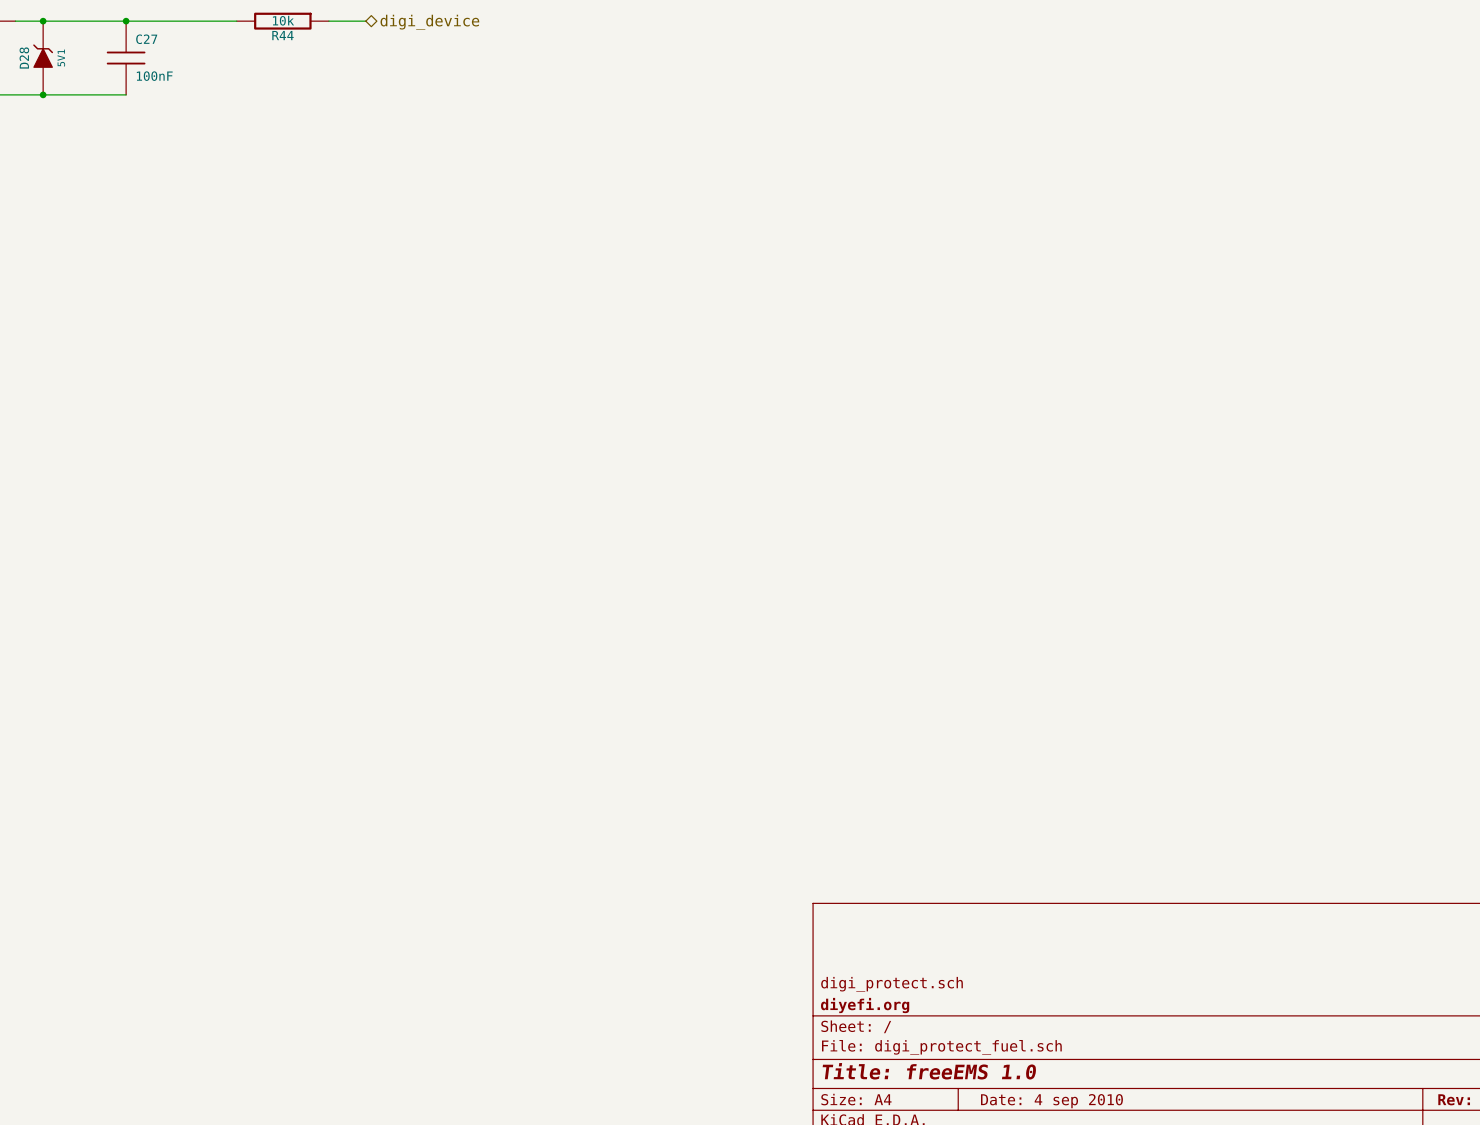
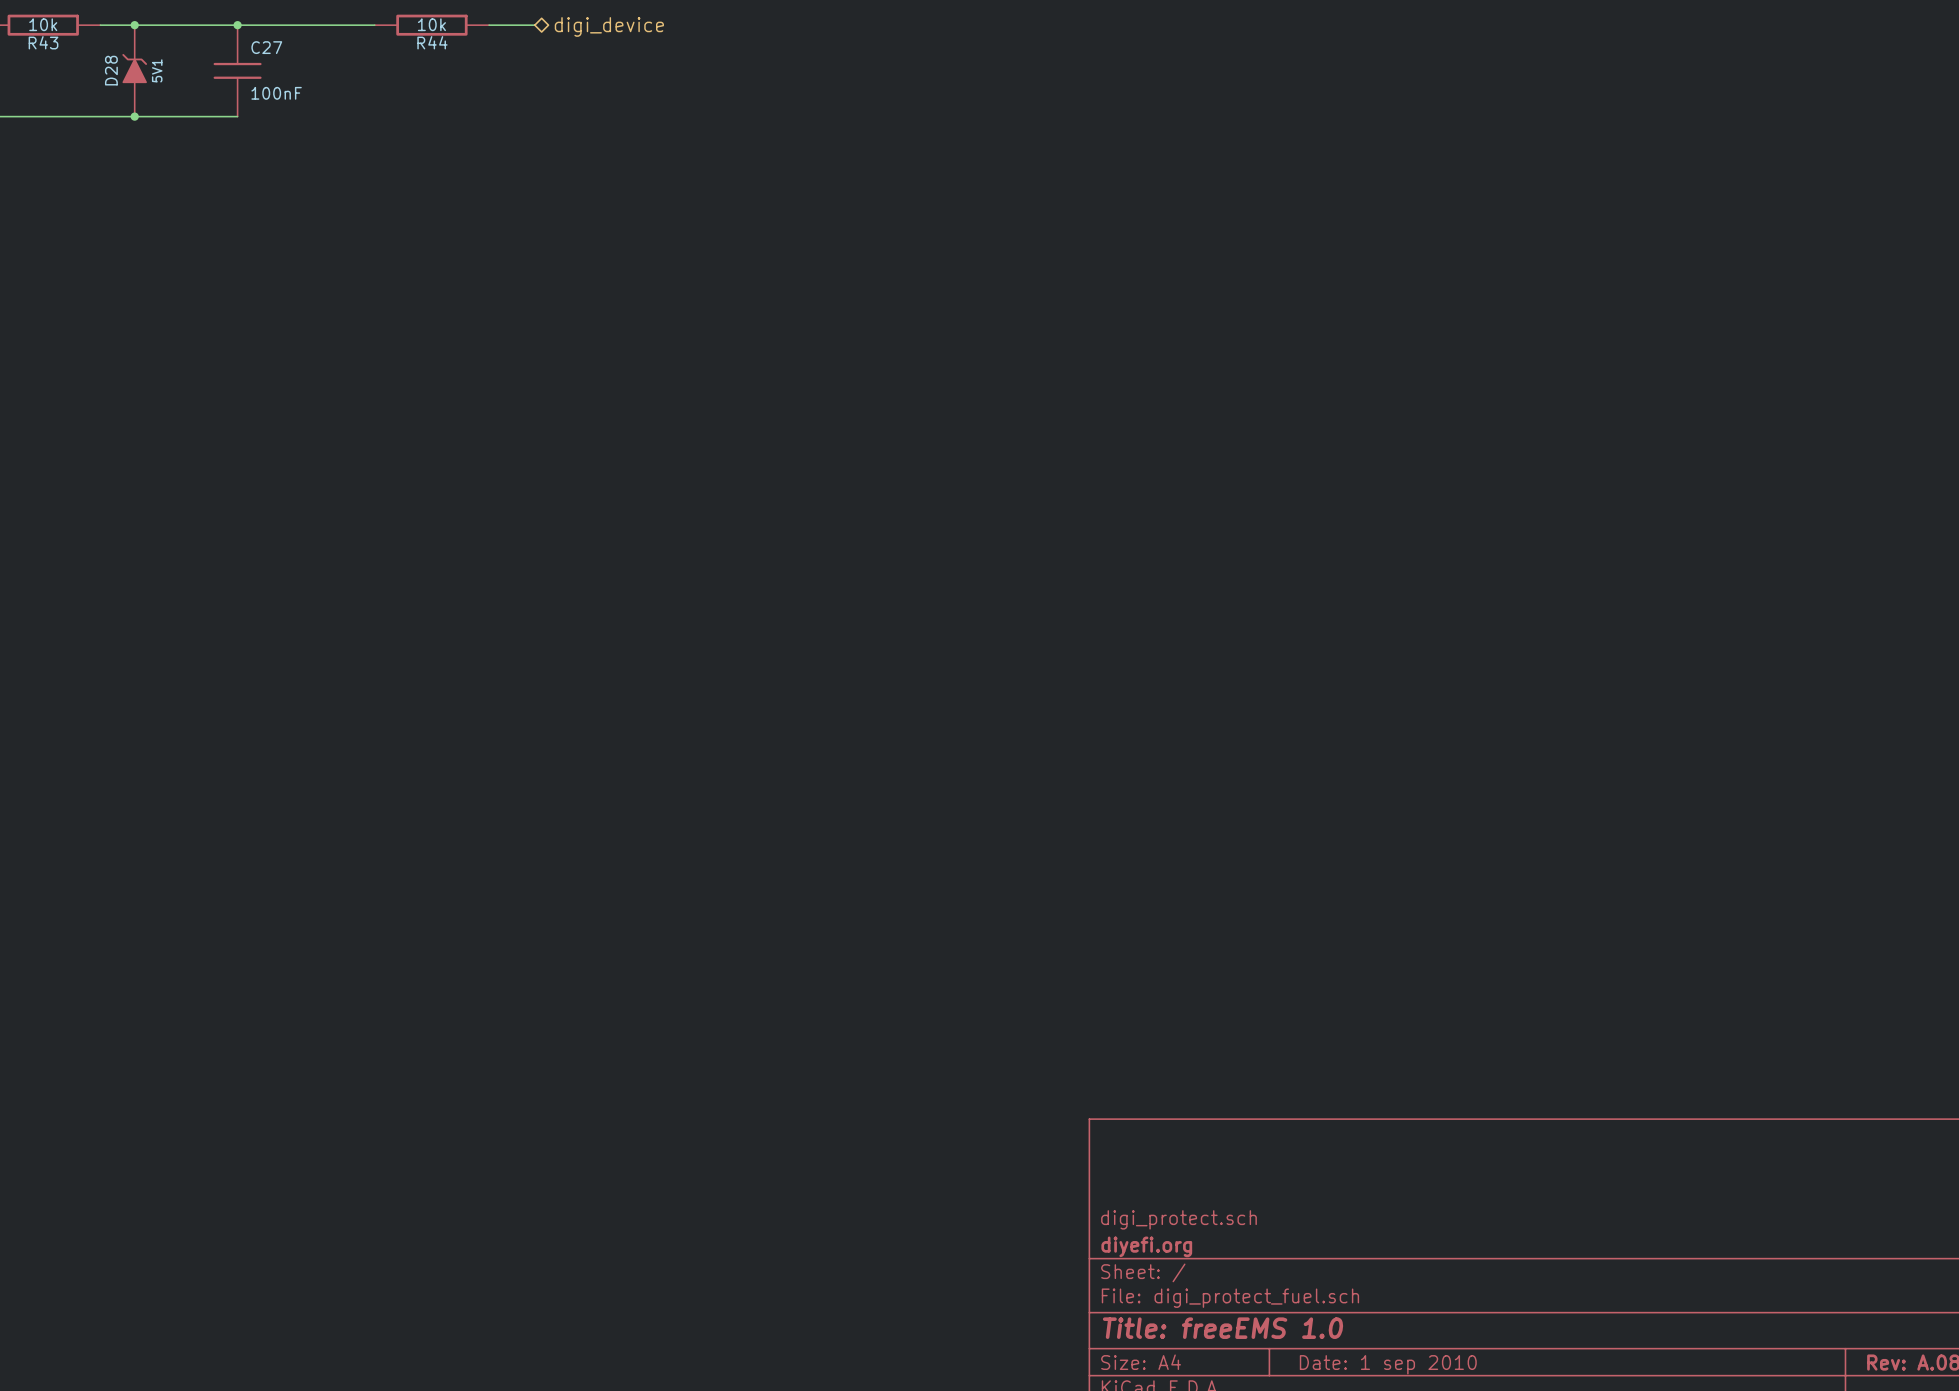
title block: Date: 4 sep 2010 (1051, 1101) -> Date: 1 sep 2010 (1388, 1364)

